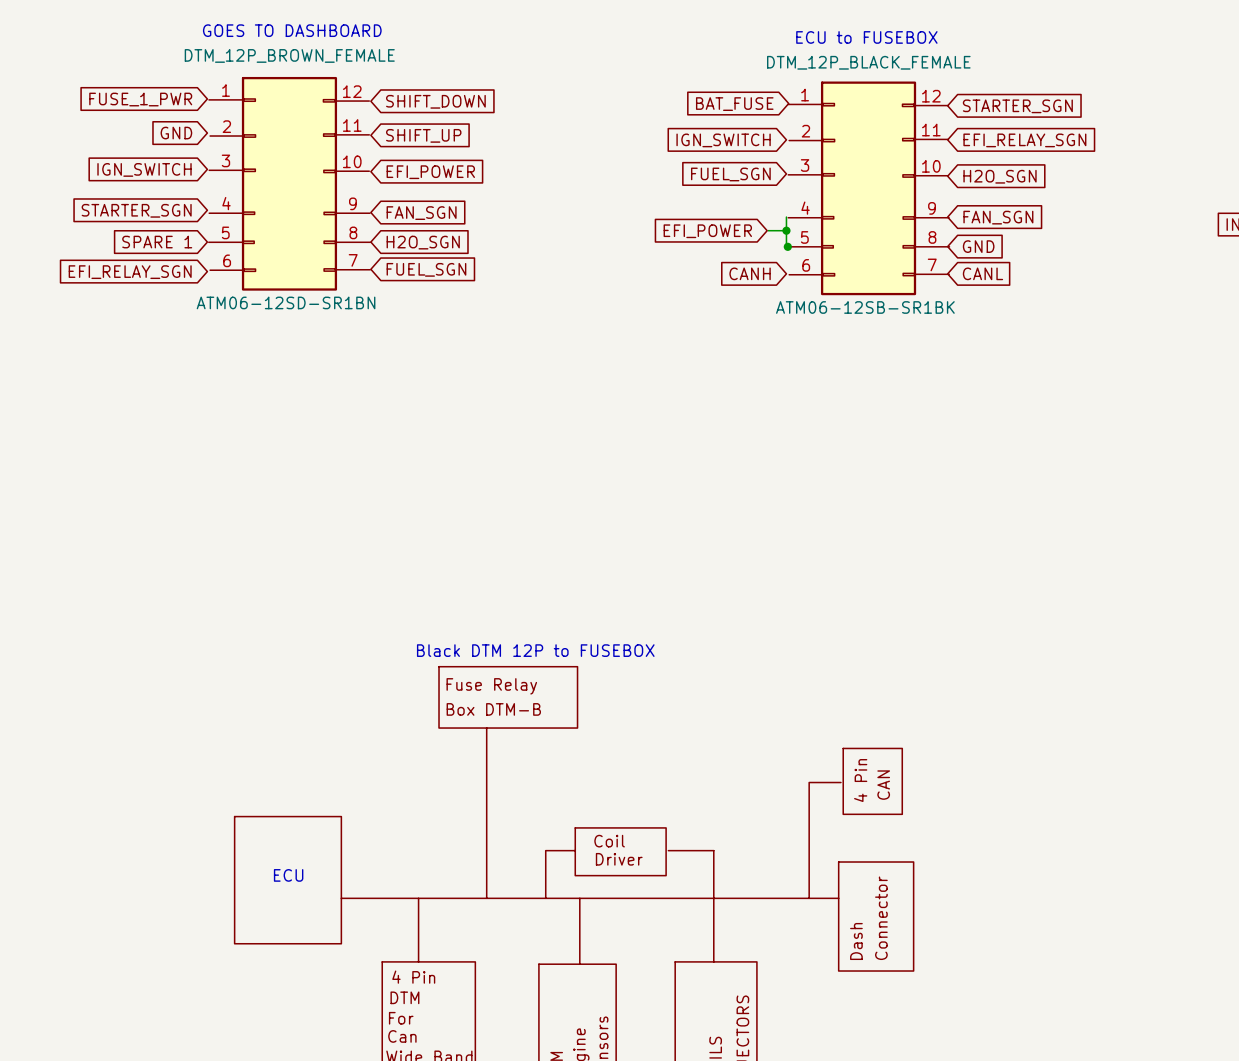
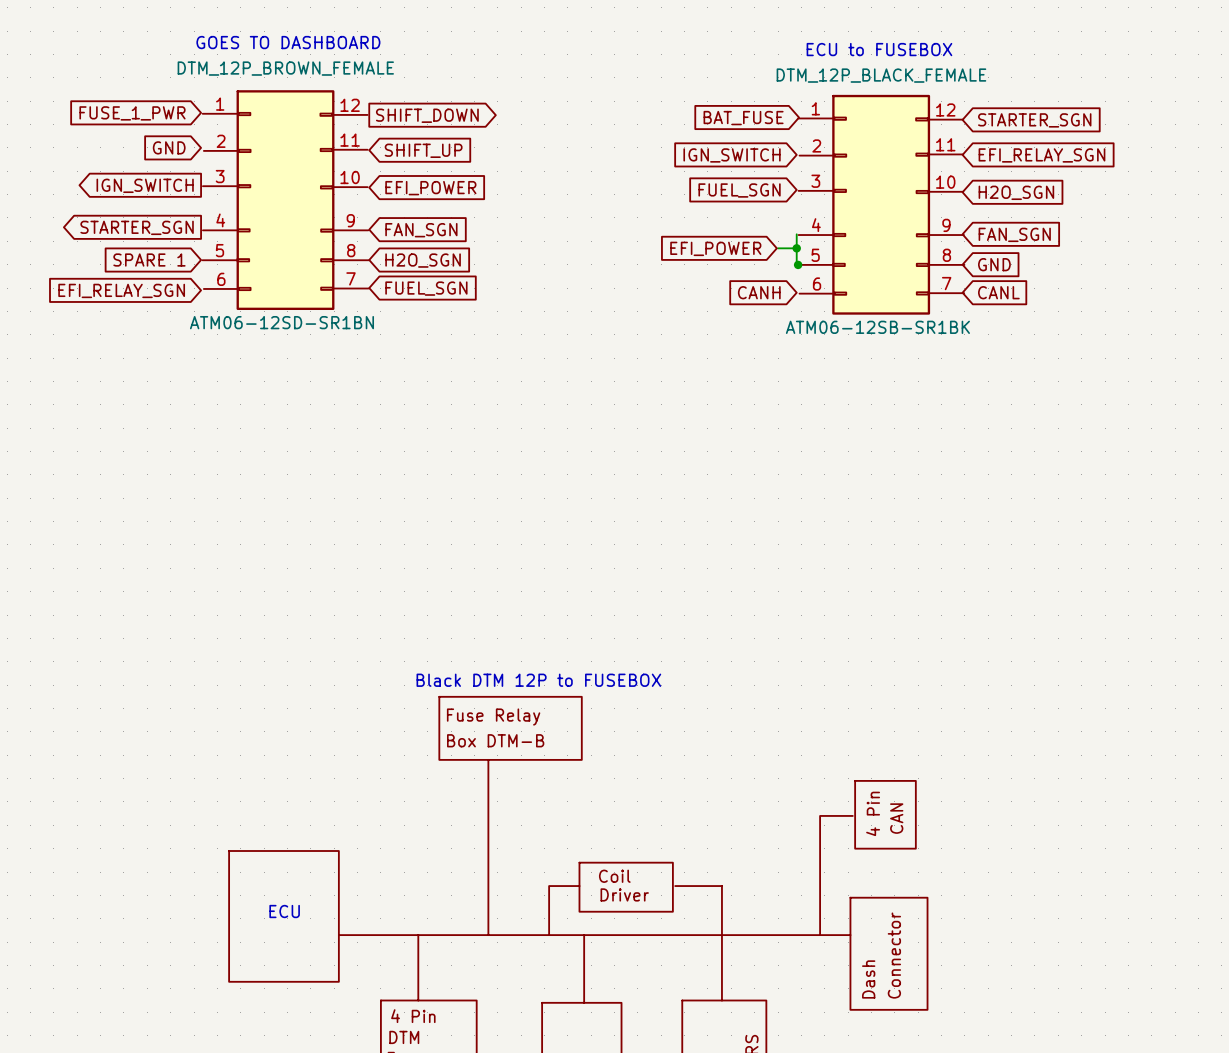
global label shape: input (435, 101) -> output (427, 115)
global label shape: input (144, 169) -> output (145, 185)
global label shape: input (136, 210) -> output (137, 227)

